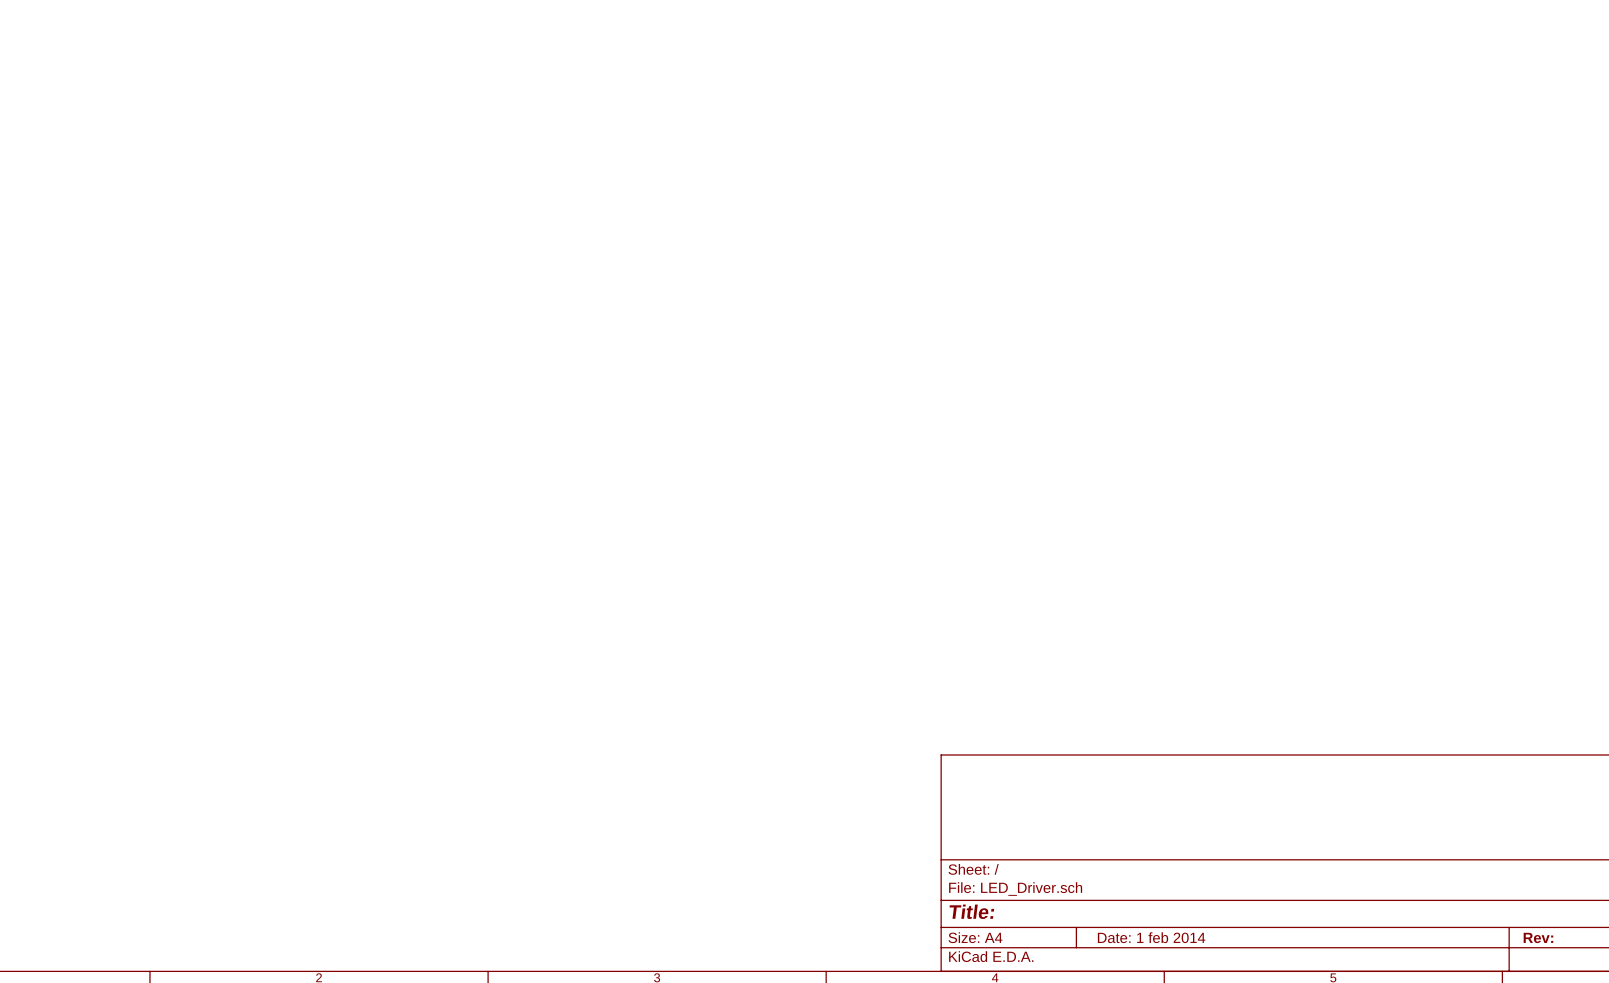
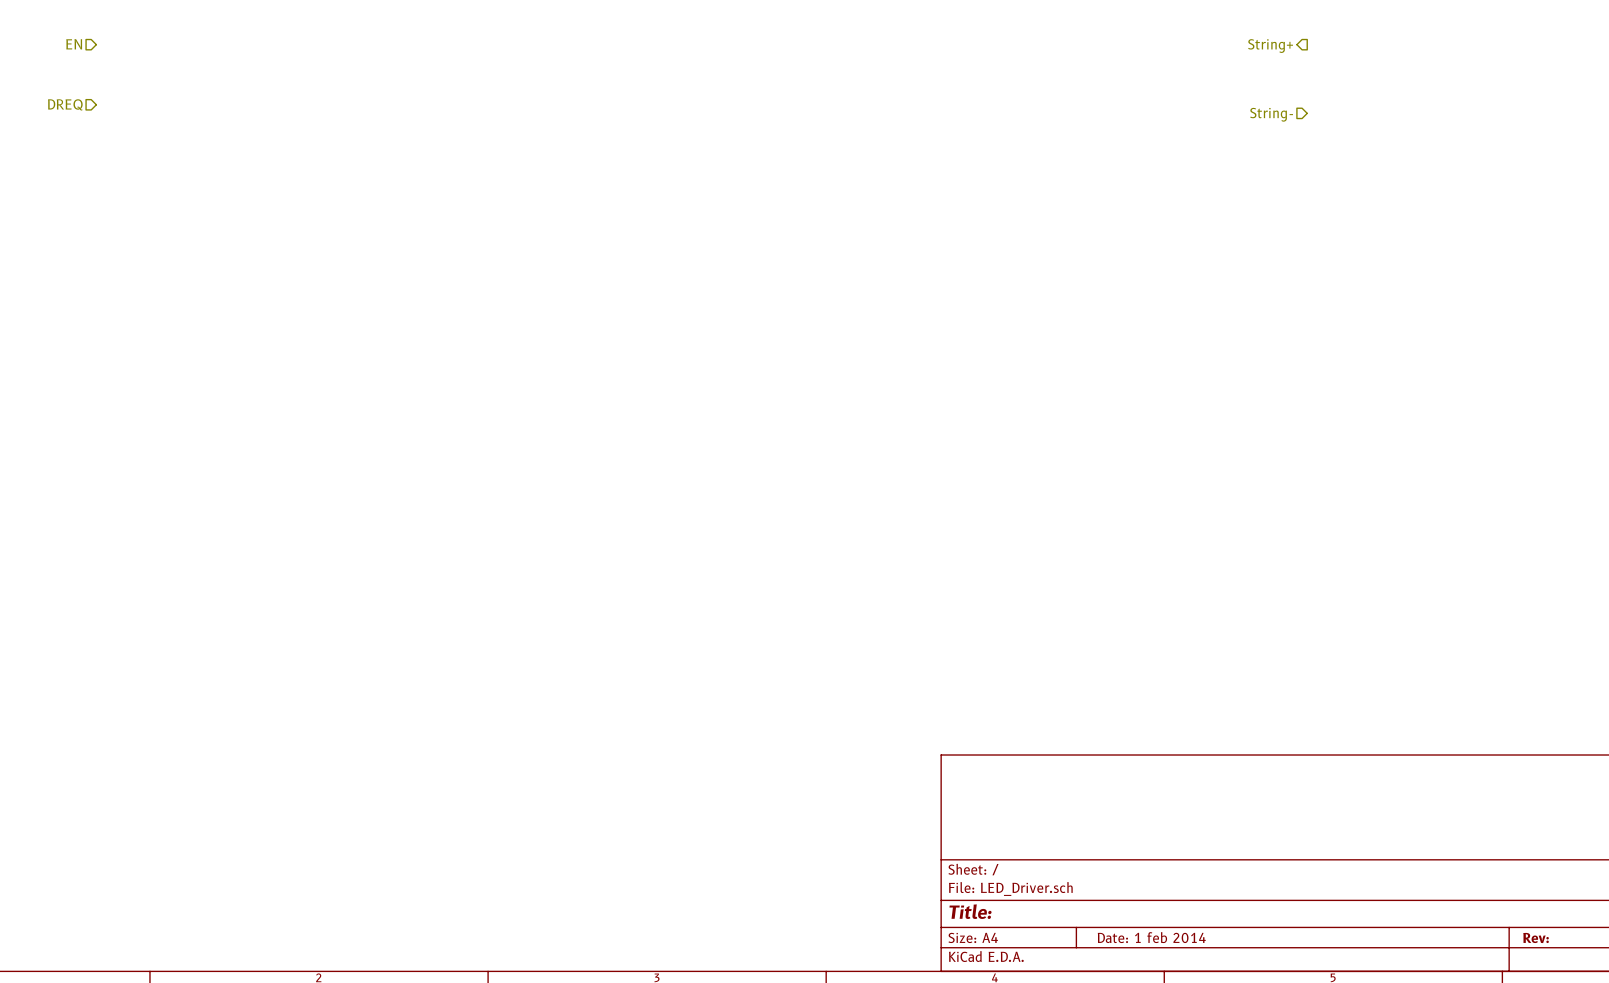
hierarchical label: none -> EN (74, 44)
hierarchical label: none -> String+ (1270, 46)
hierarchical label: none -> DREQ (65, 104)
hierarchical label: none -> String- (1271, 114)

